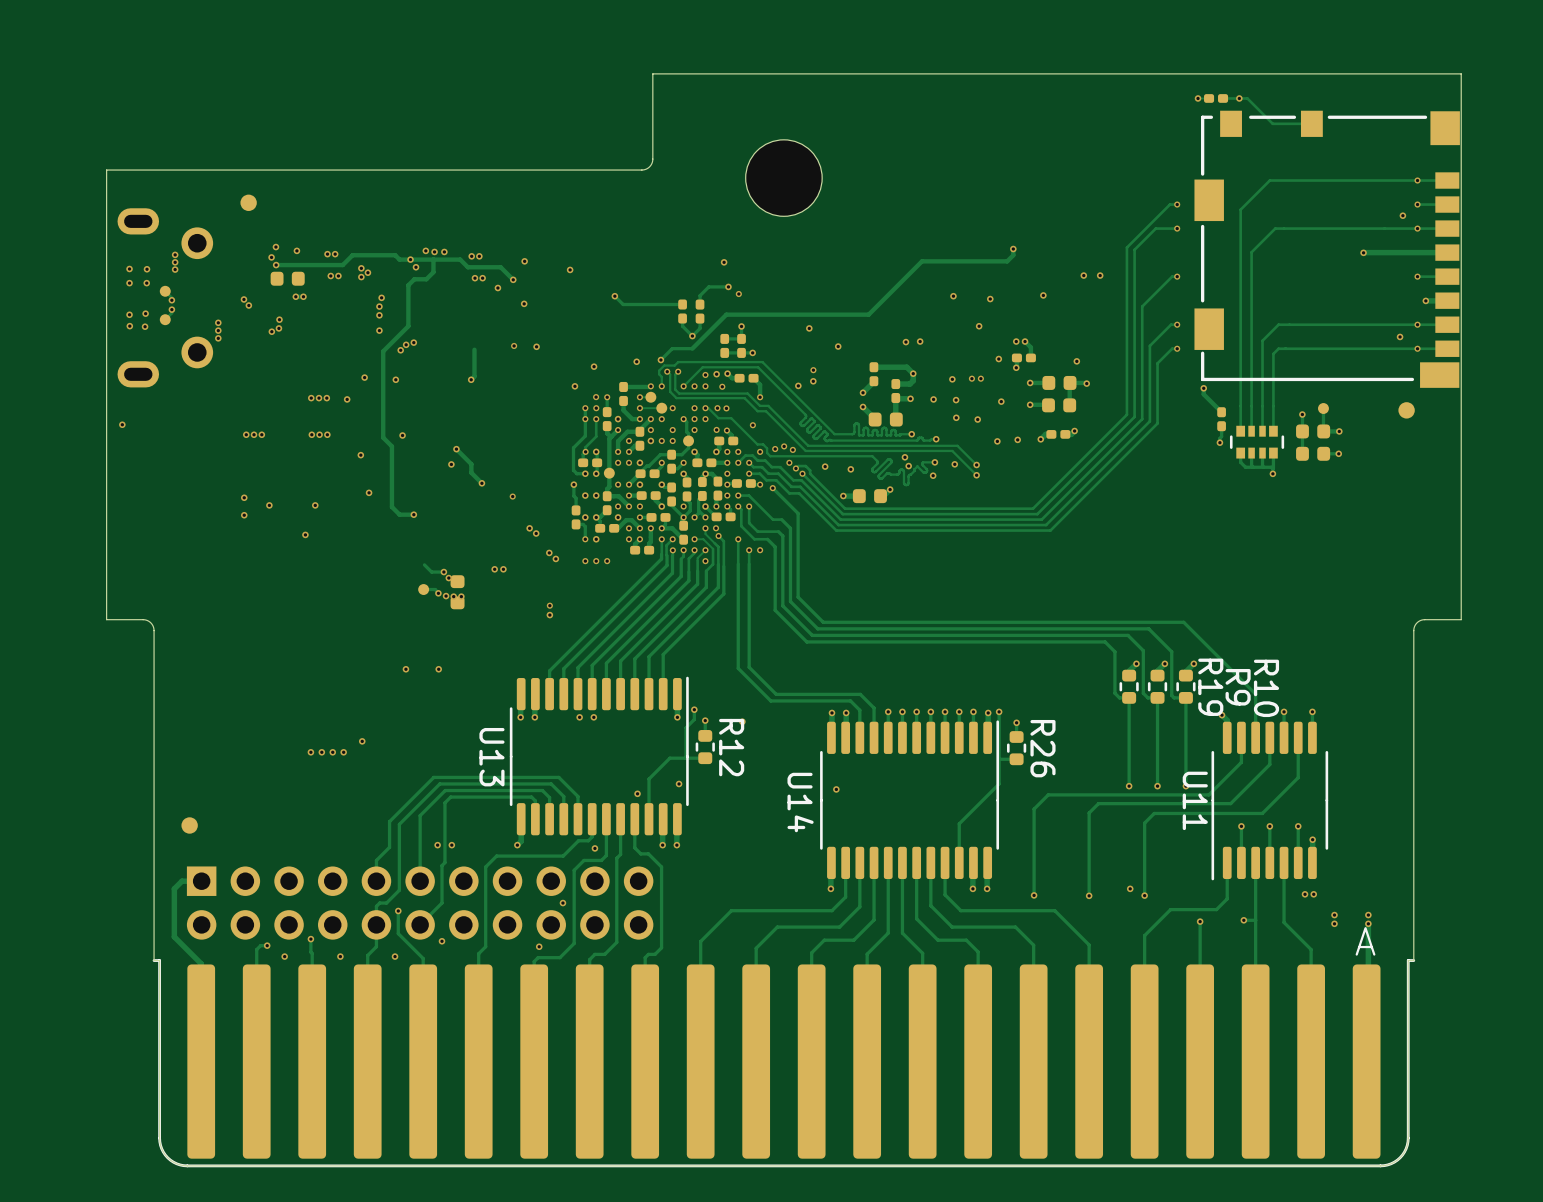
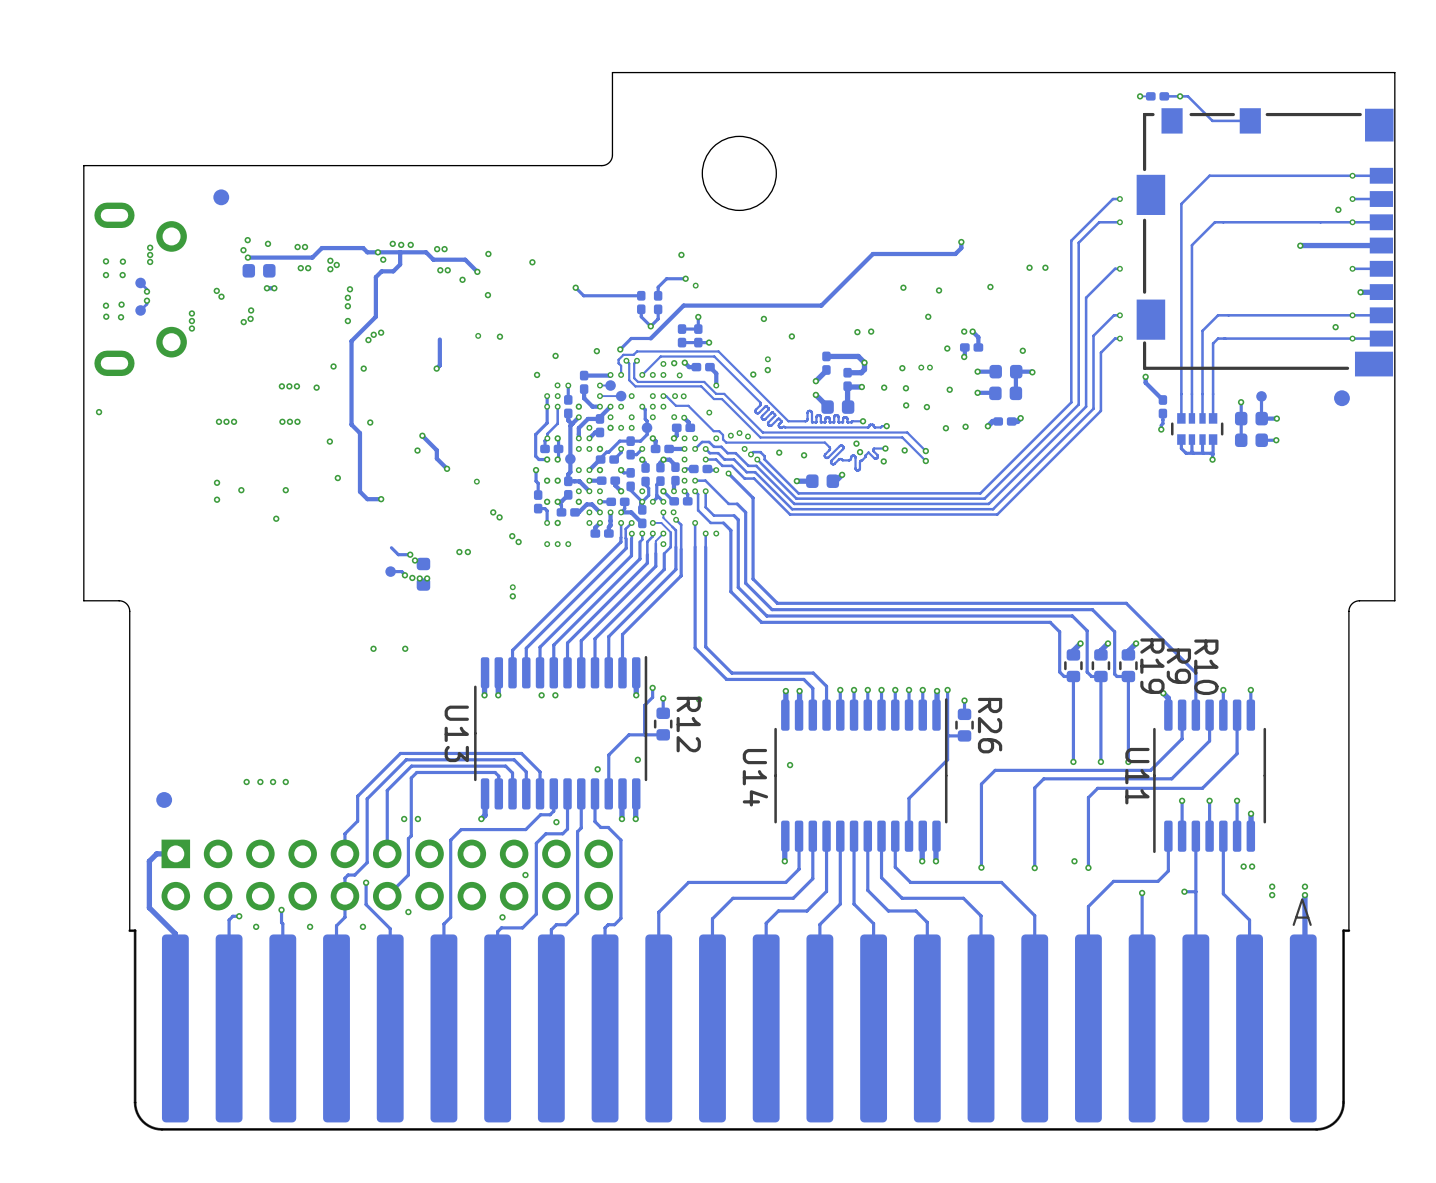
via: (362, 741) -> none
via: (310, 752) -> none
via: (321, 752) -> none
via: (332, 752) -> none
via: (343, 752) -> none
via: none -> (246, 781)
via: none -> (260, 781)
via: none -> (273, 781)
via: none -> (285, 781)

